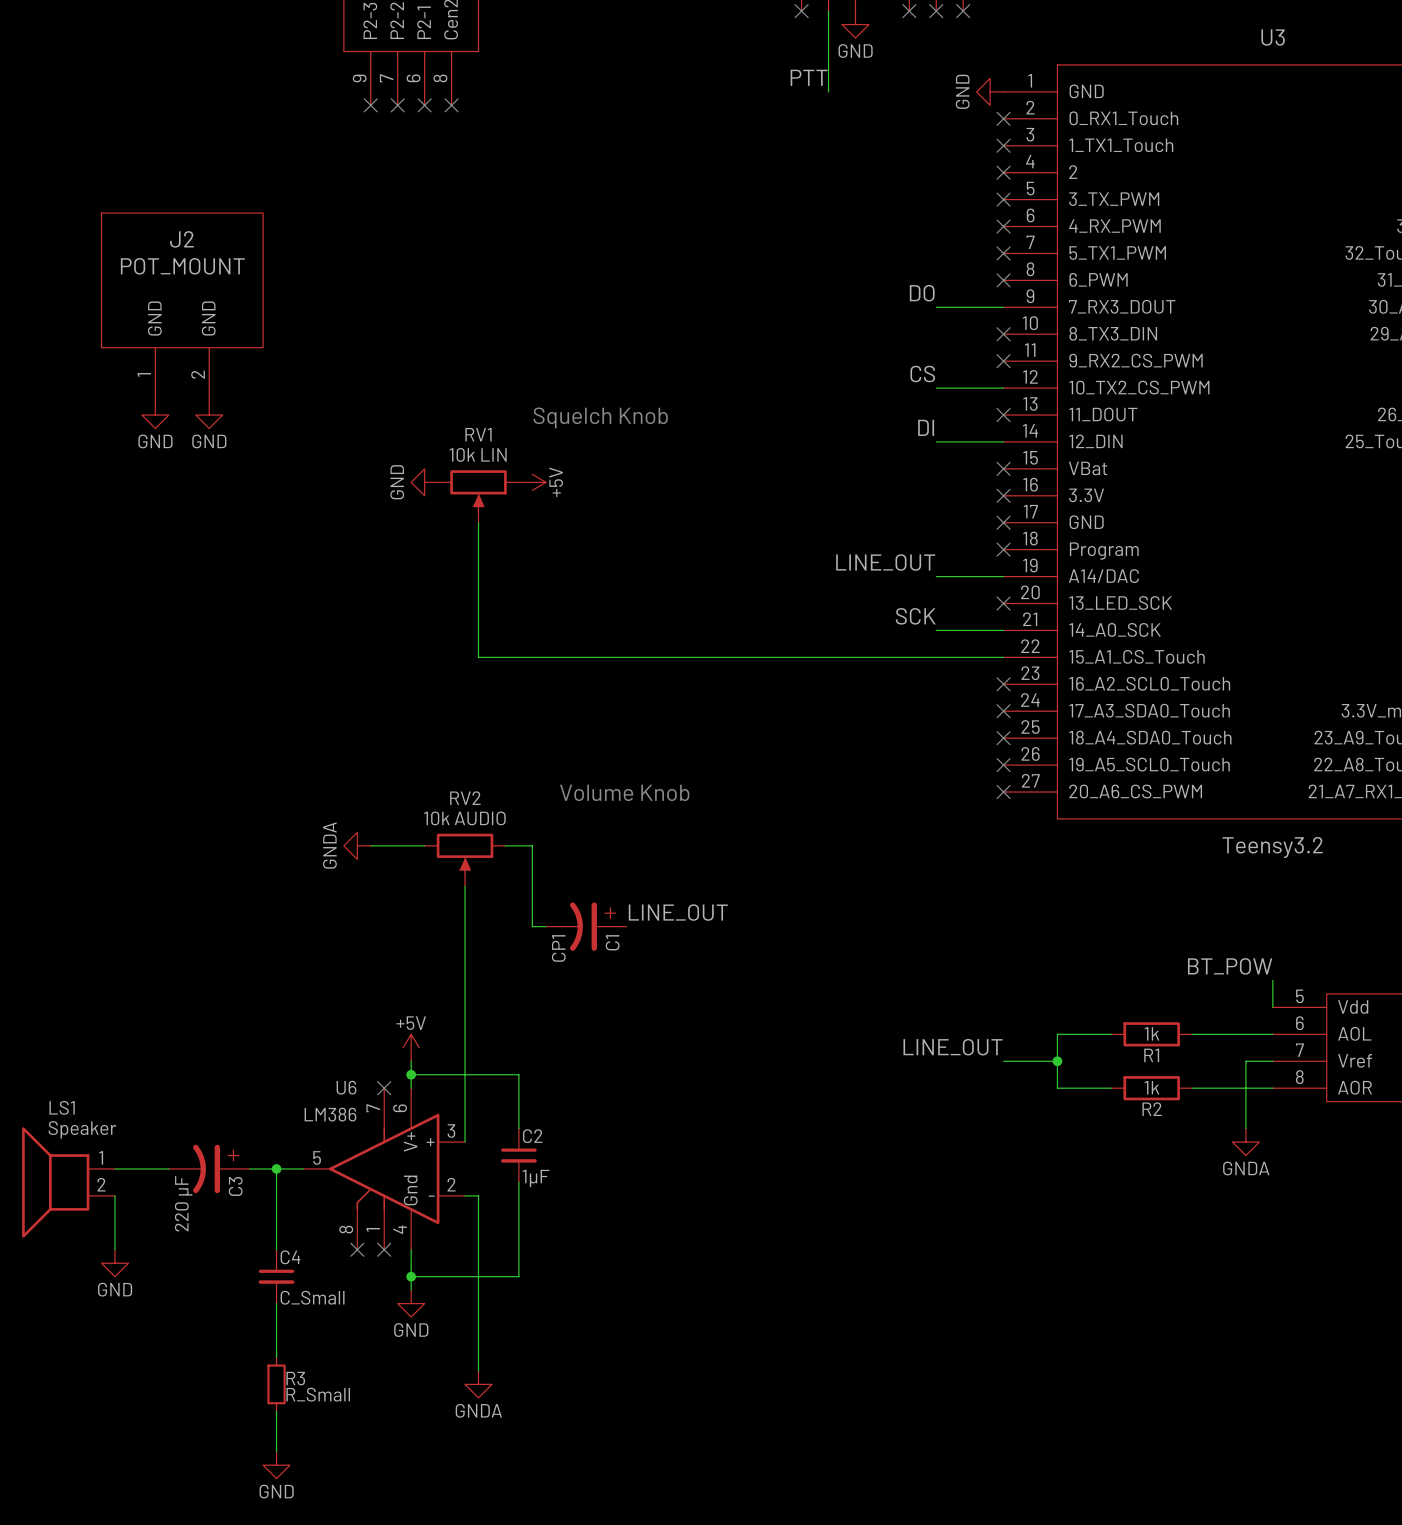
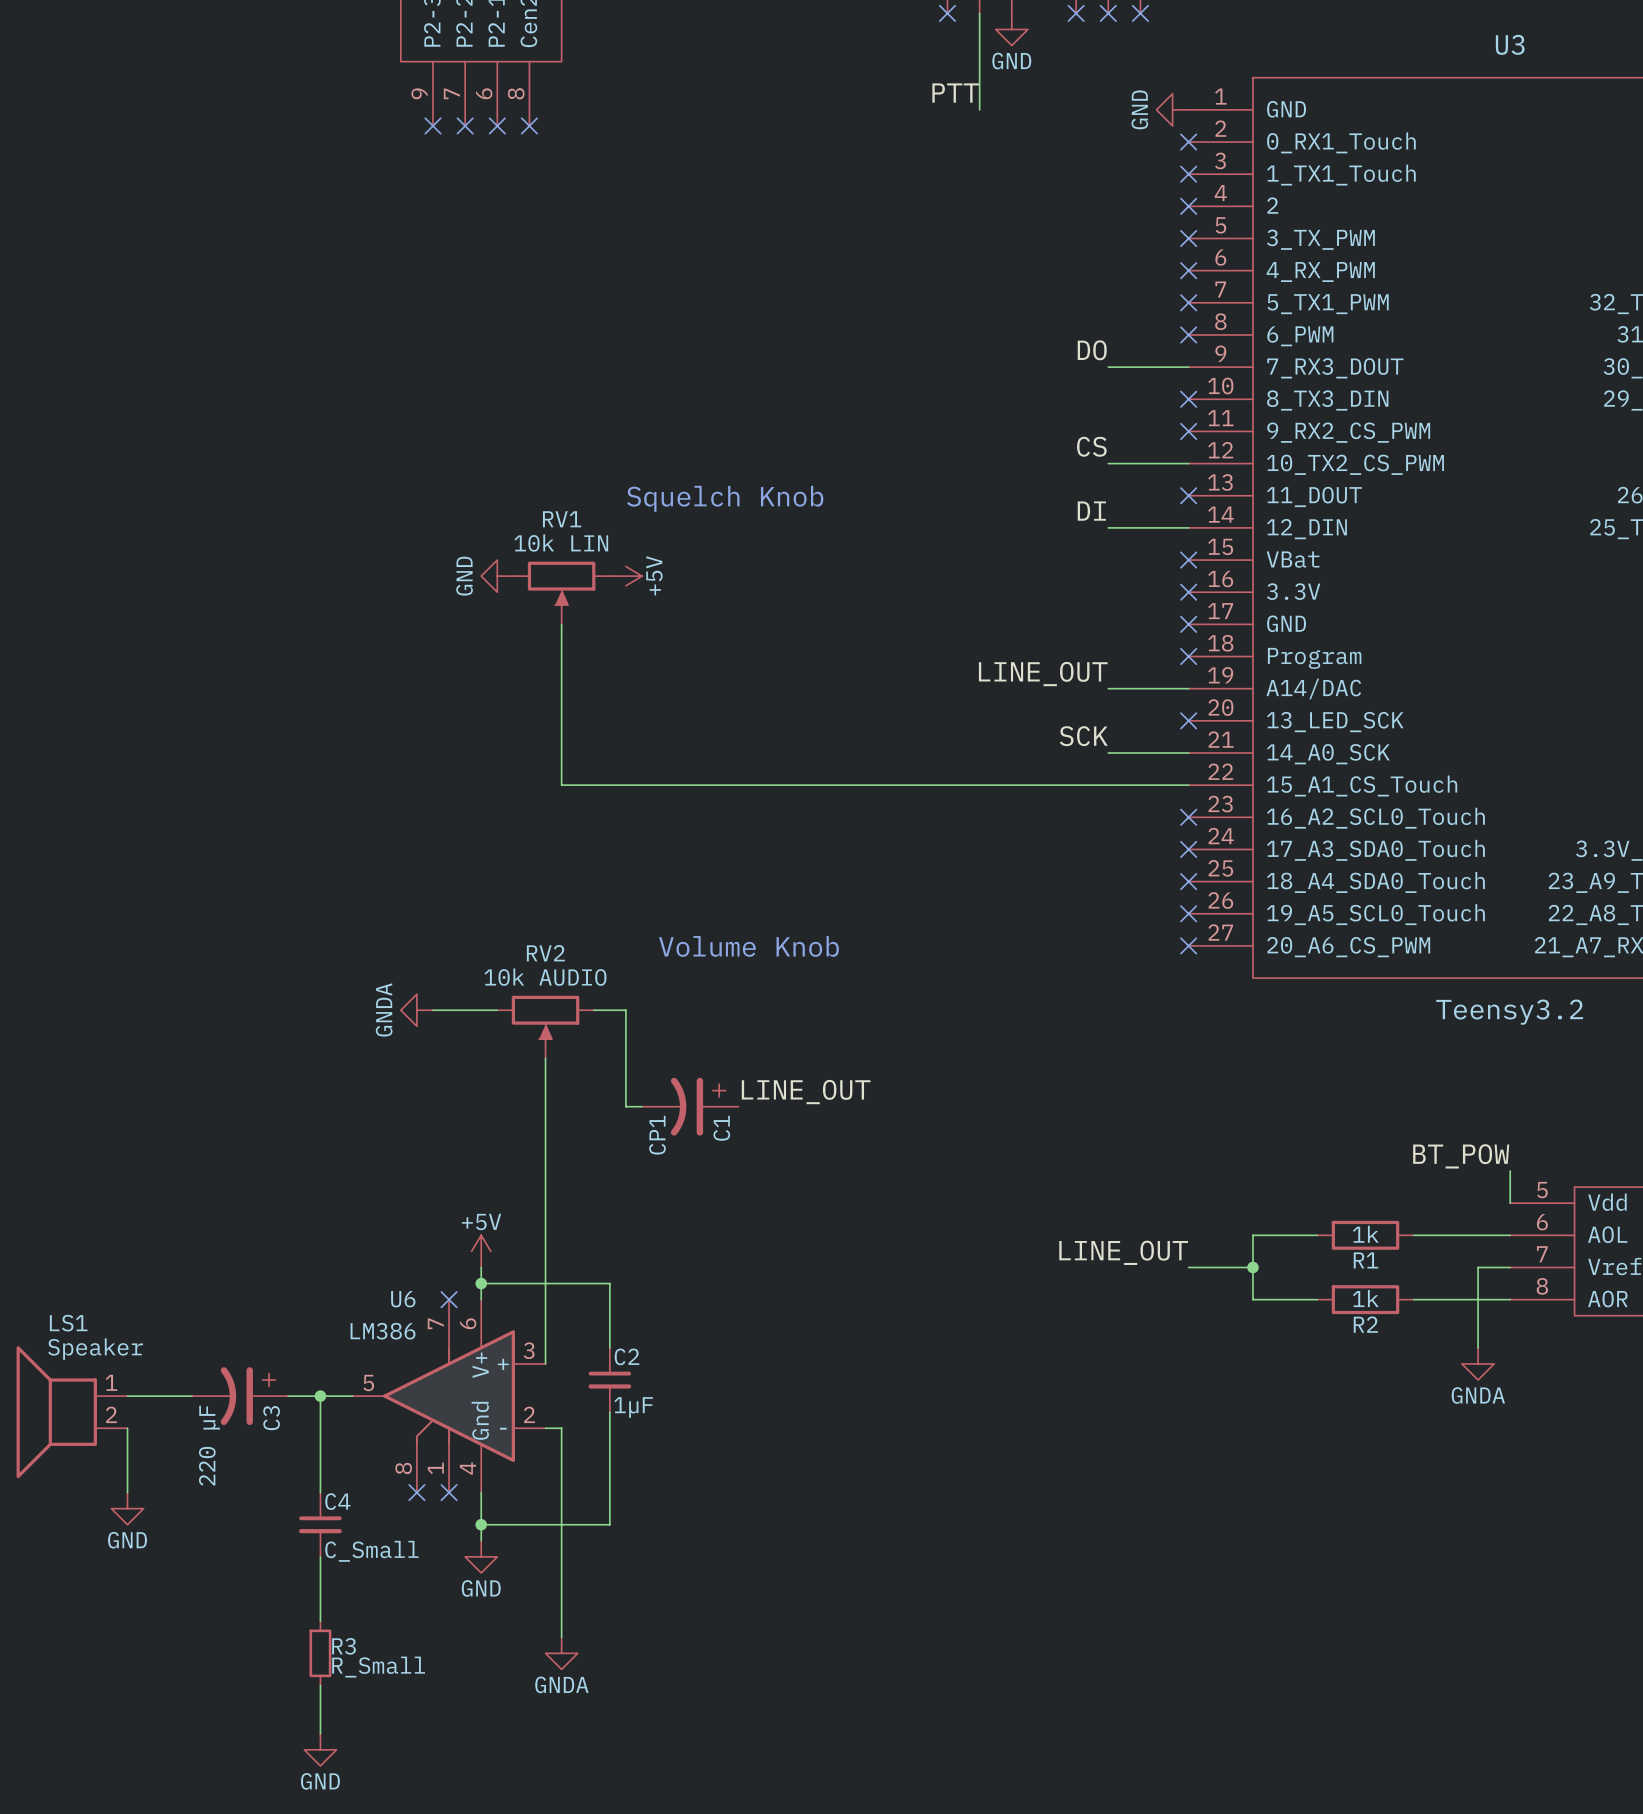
J2: POT_MOUNT (182, 307) -> none
power symbol: GND (155, 415) -> none
power symbol: GND (209, 415) -> none

